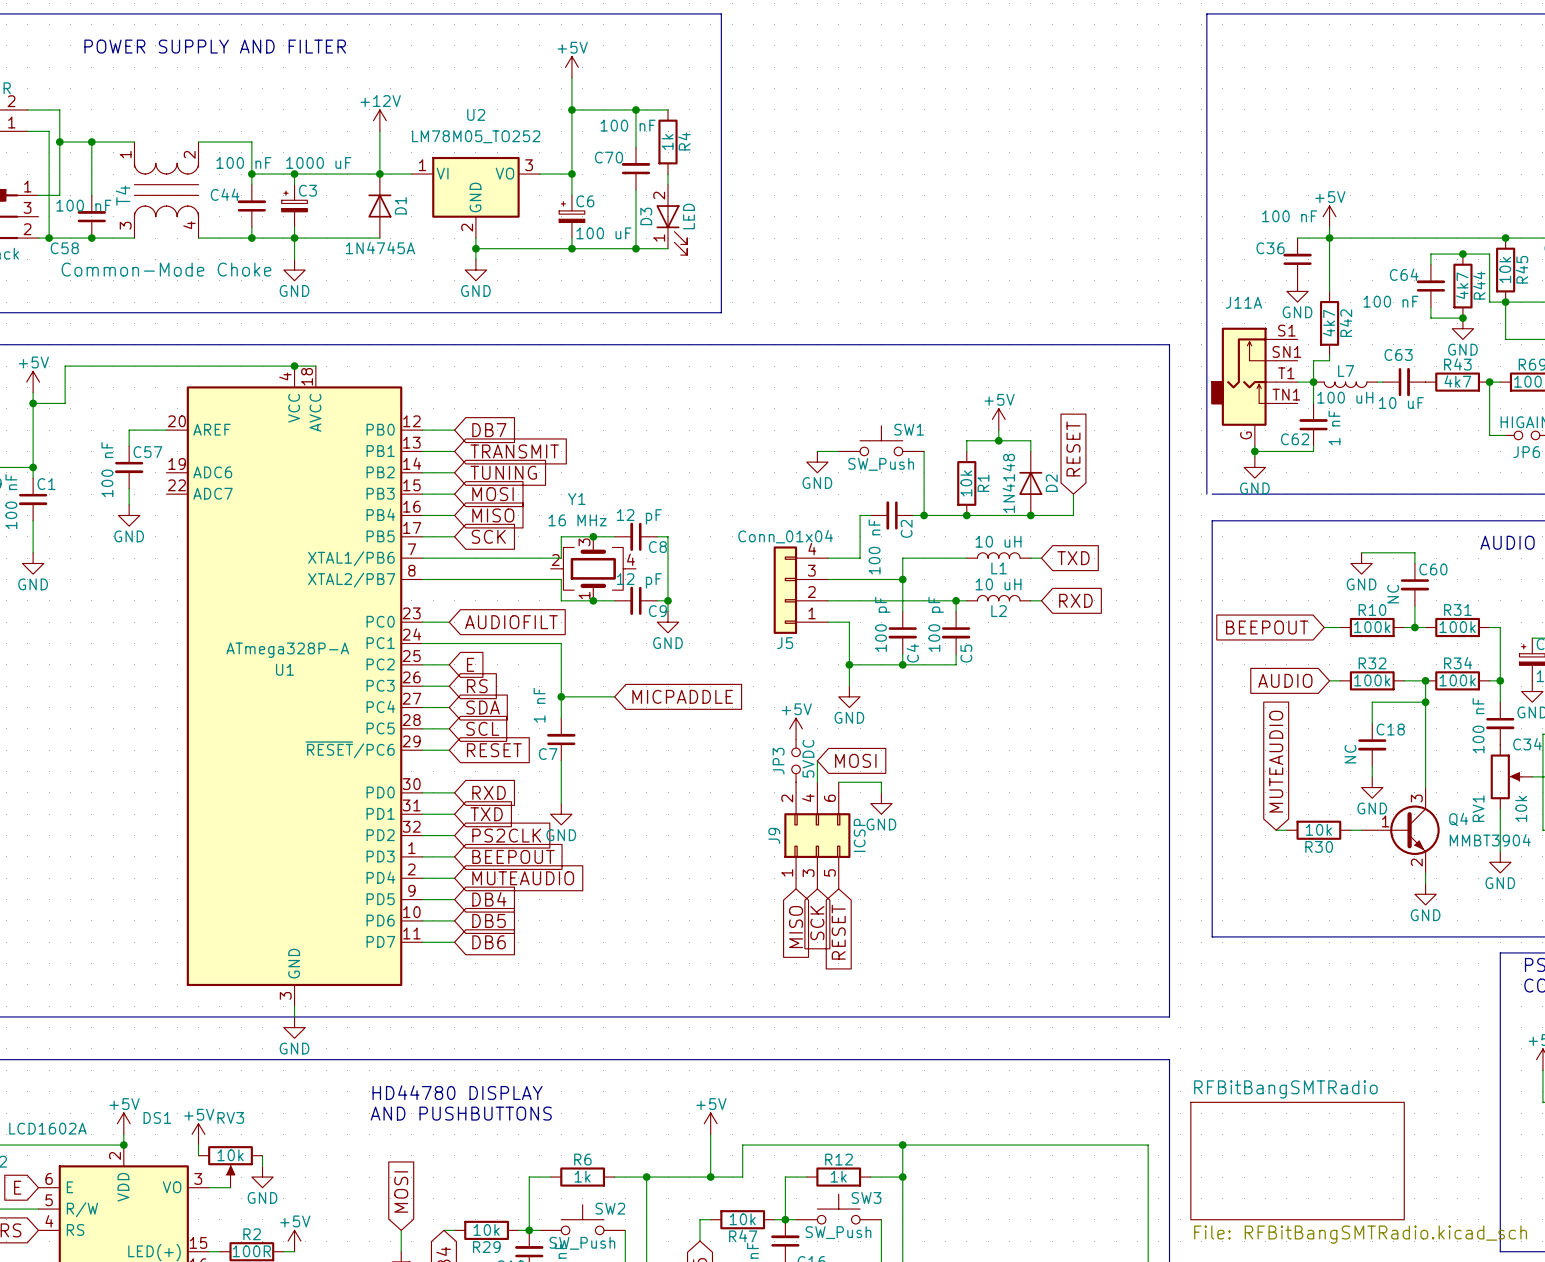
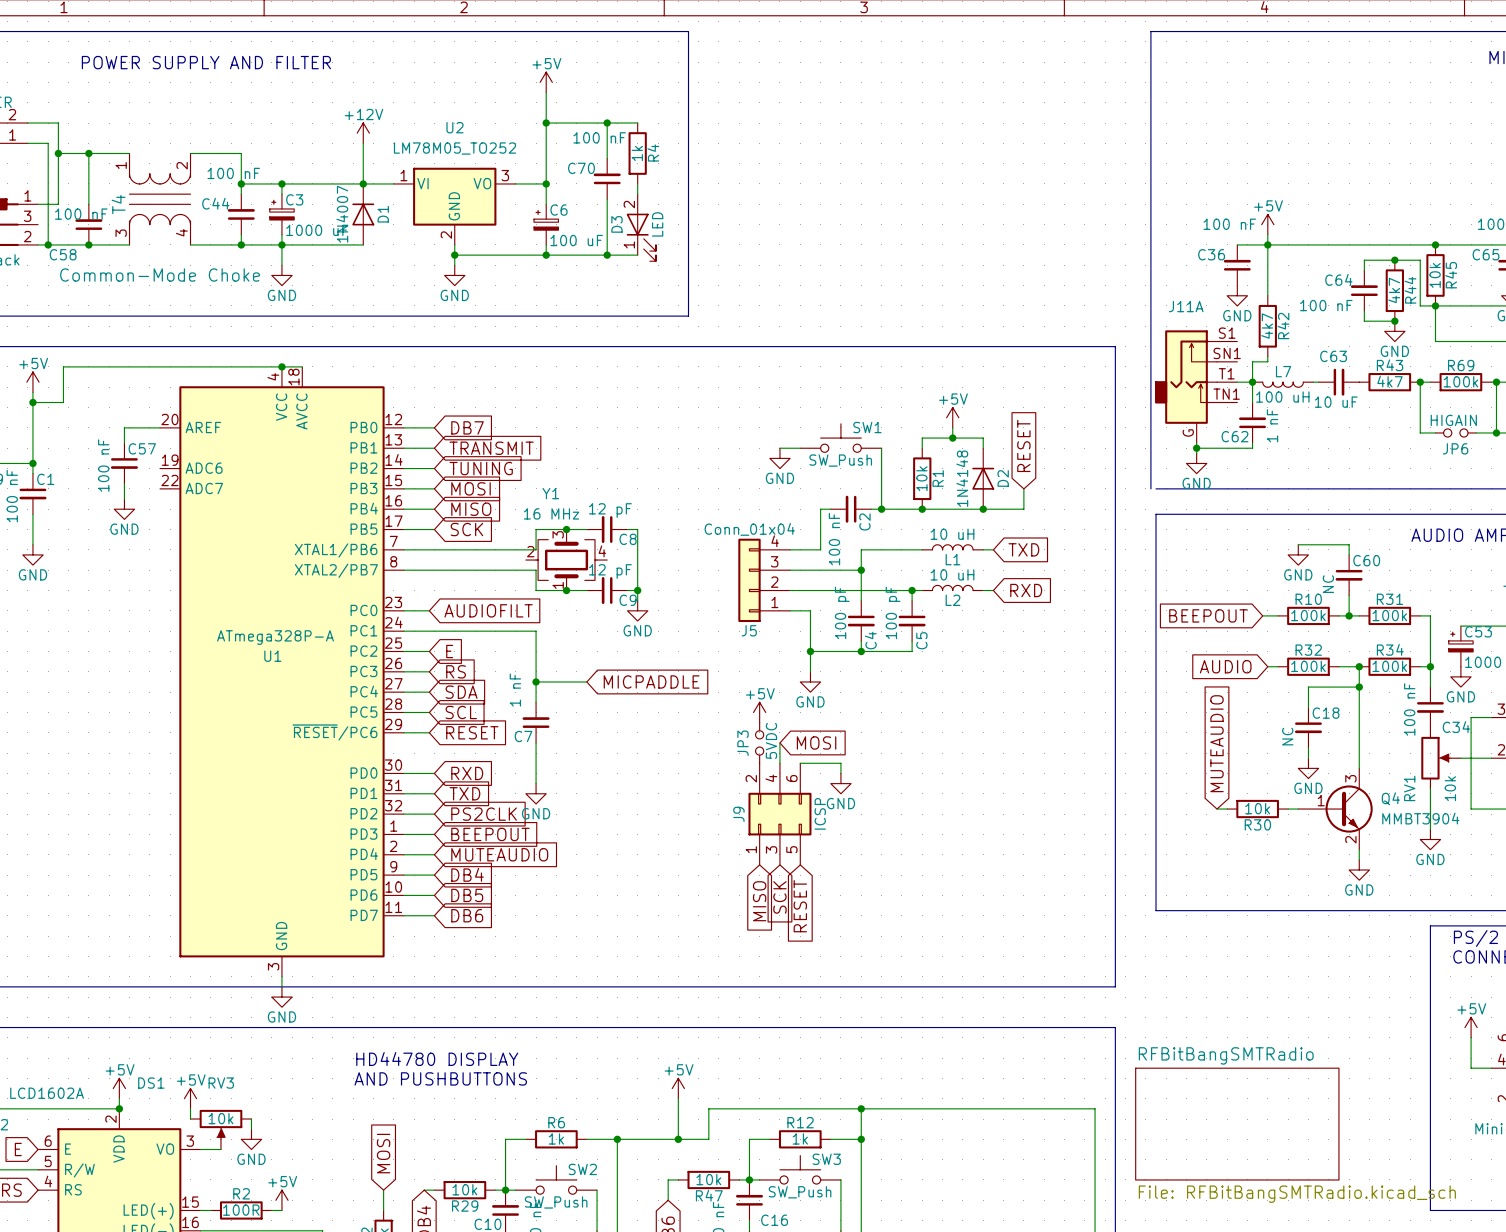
C3 value position: 1000 uF (318, 162) -> 1000 uF (317, 230)
D1 value: 1N4745A (380, 248) -> 1N4007 (342, 214)

